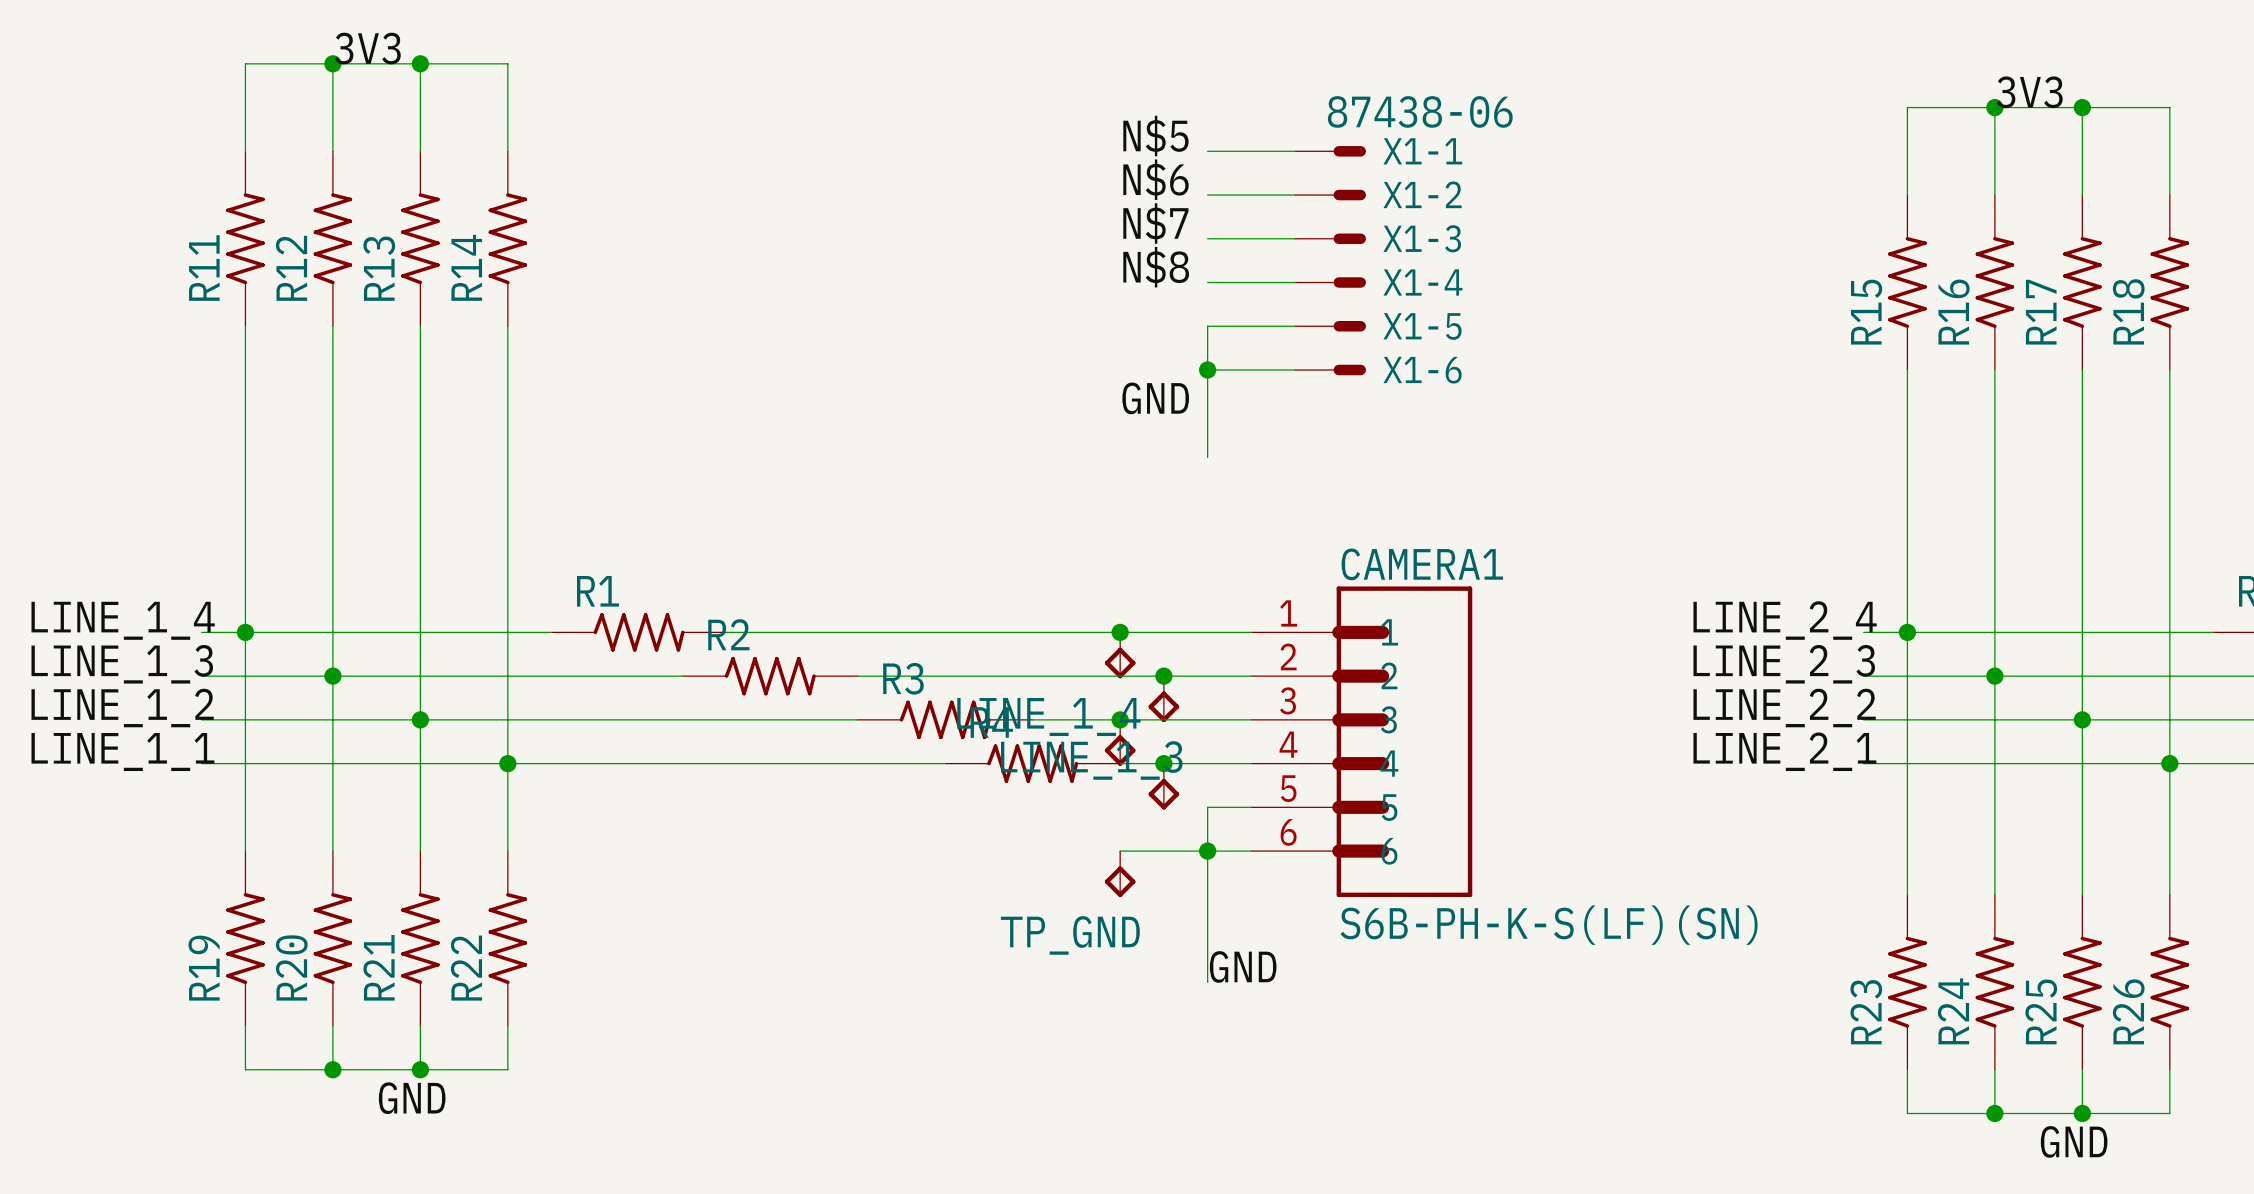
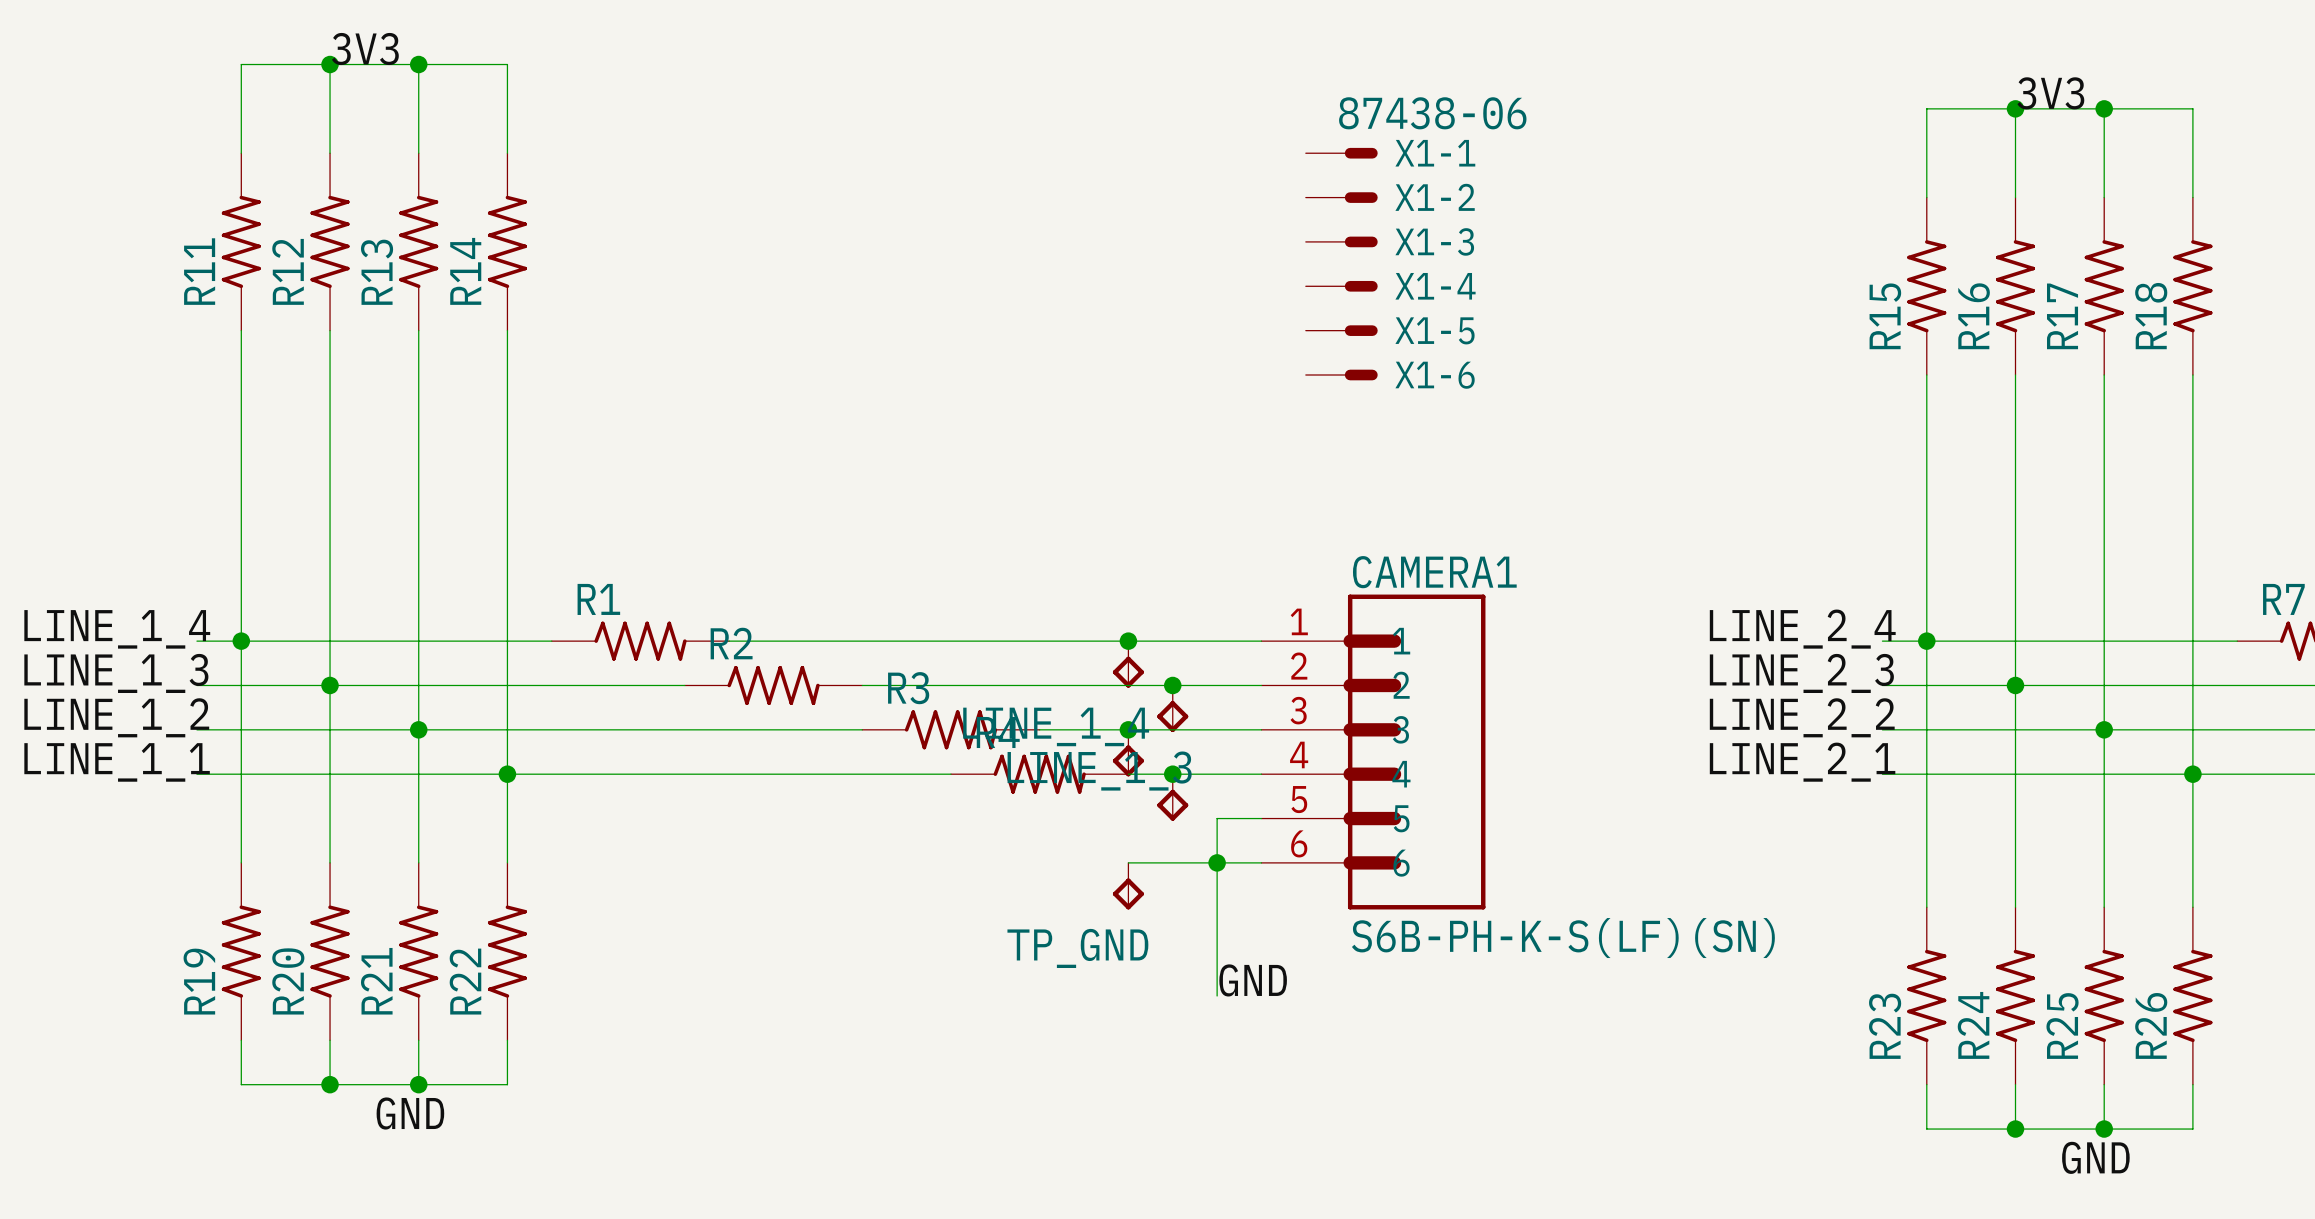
label: N$5 (1155, 135) -> none
wire: (1207, 151) (1295, 151) -> none
label: N$6 (1156, 179) -> none
wire: (1207, 195) (1295, 195) -> none
label: N$7 (1155, 223) -> none
wire: (1207, 238) (1295, 238) -> none
label: N$8 (1156, 267) -> none
wire: (1207, 282) (1295, 282) -> none
wire: (1295, 326) (1207, 326) (1207, 457) -> none
wire: (1207, 369) (1295, 369) -> none
junction: (1207, 369) -> none
label: GND (1155, 398) -> none

